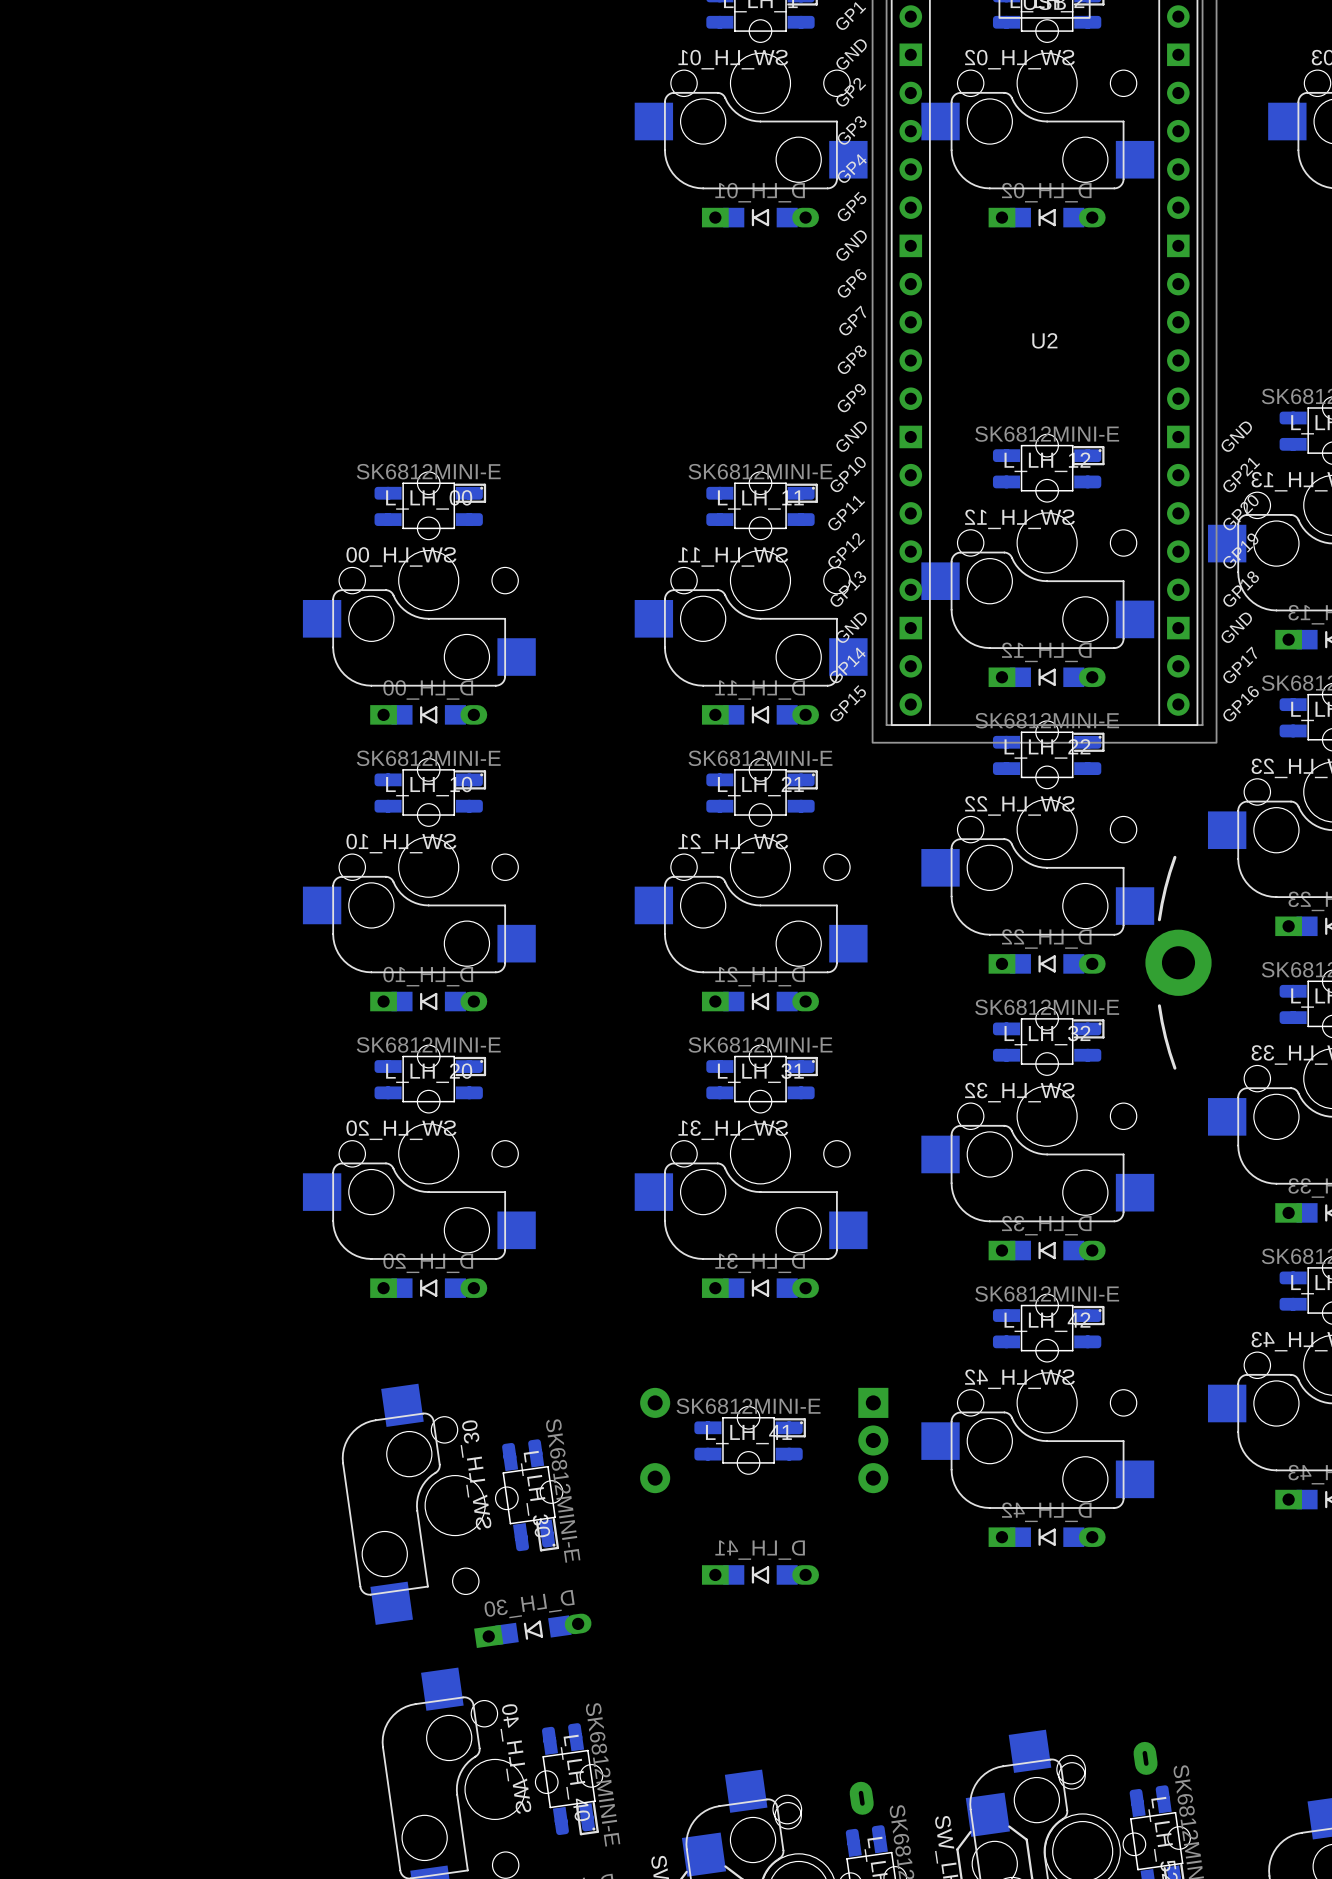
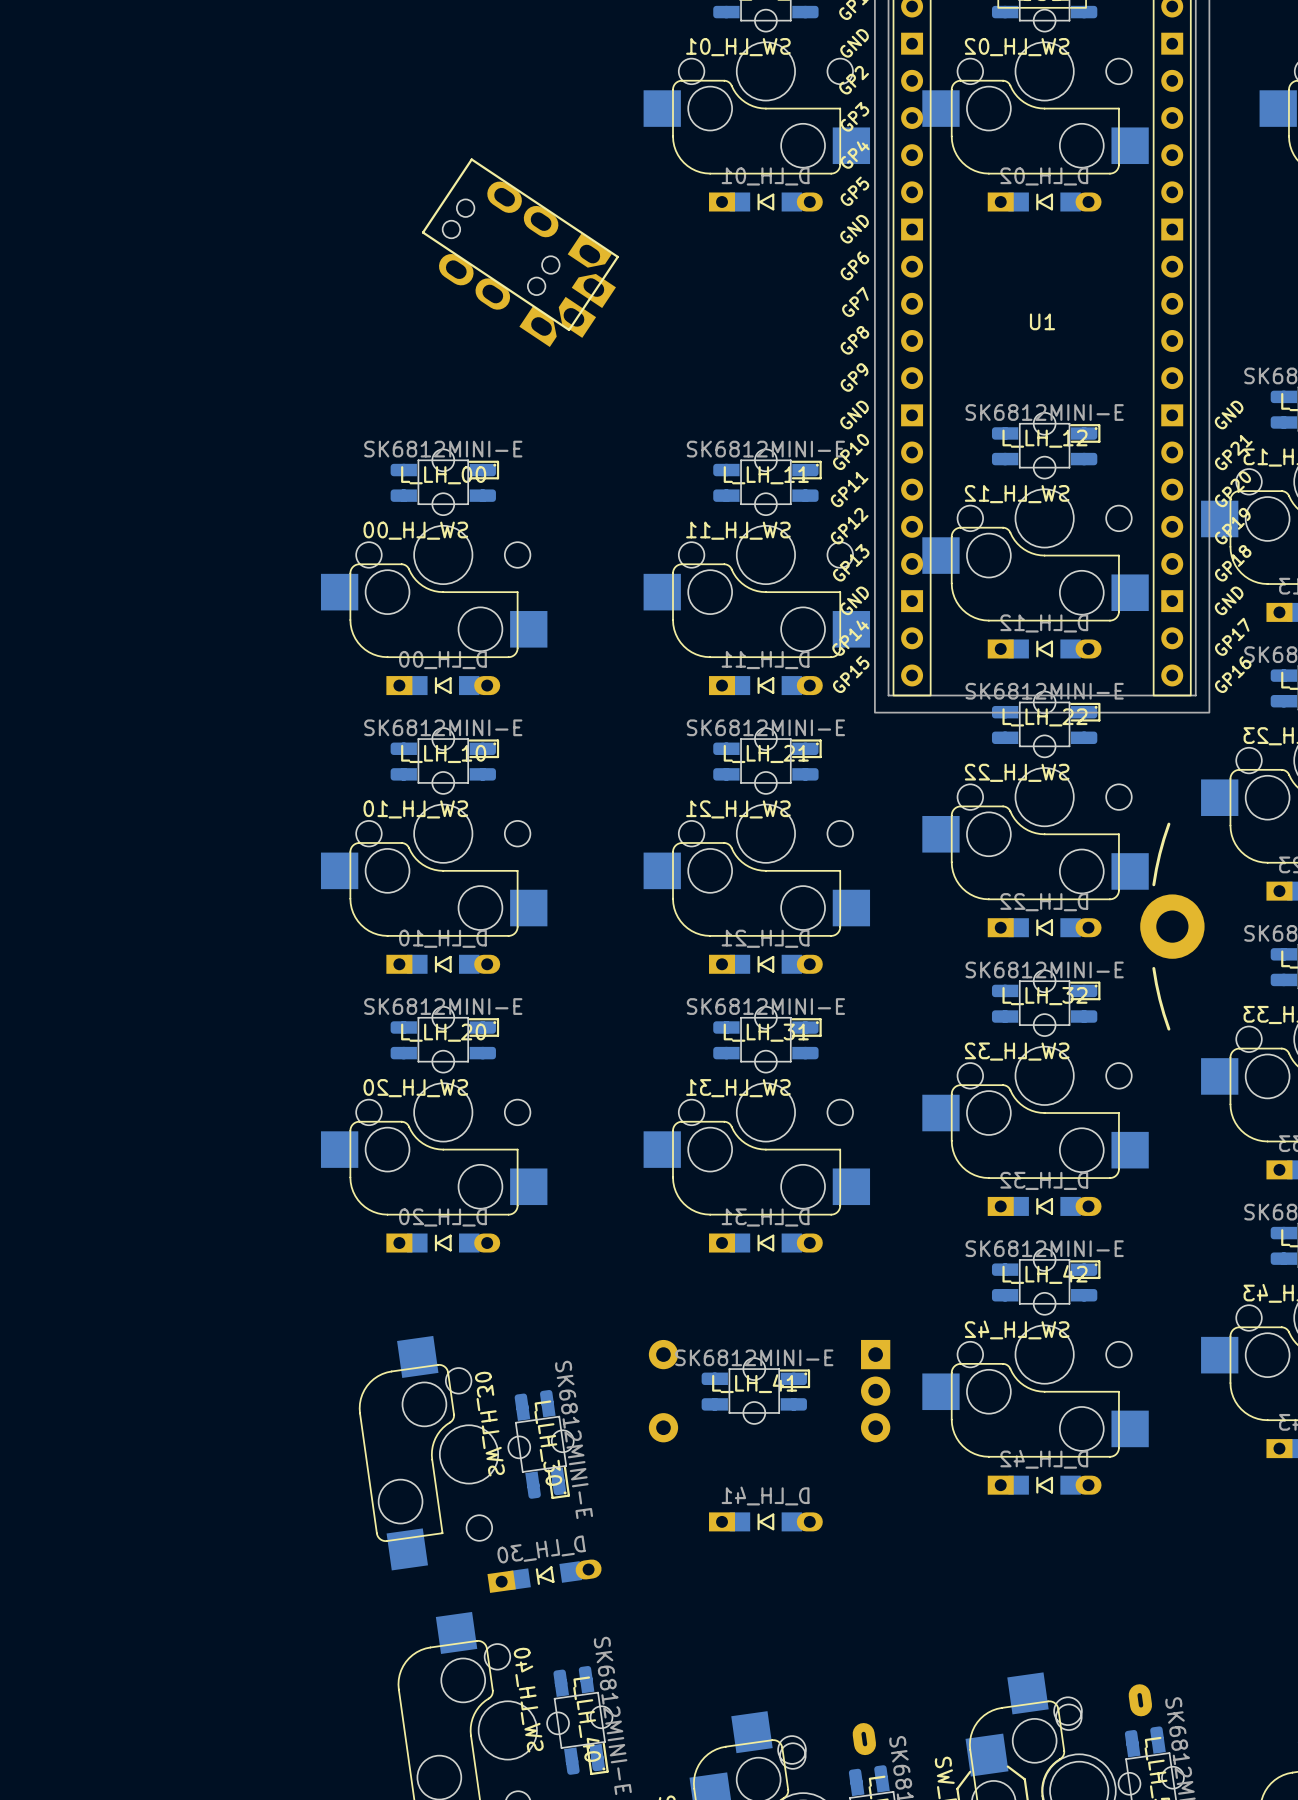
part: none -> (520, 252)
U2 name: U2 (1044, 340) -> U1 (1042, 321)

